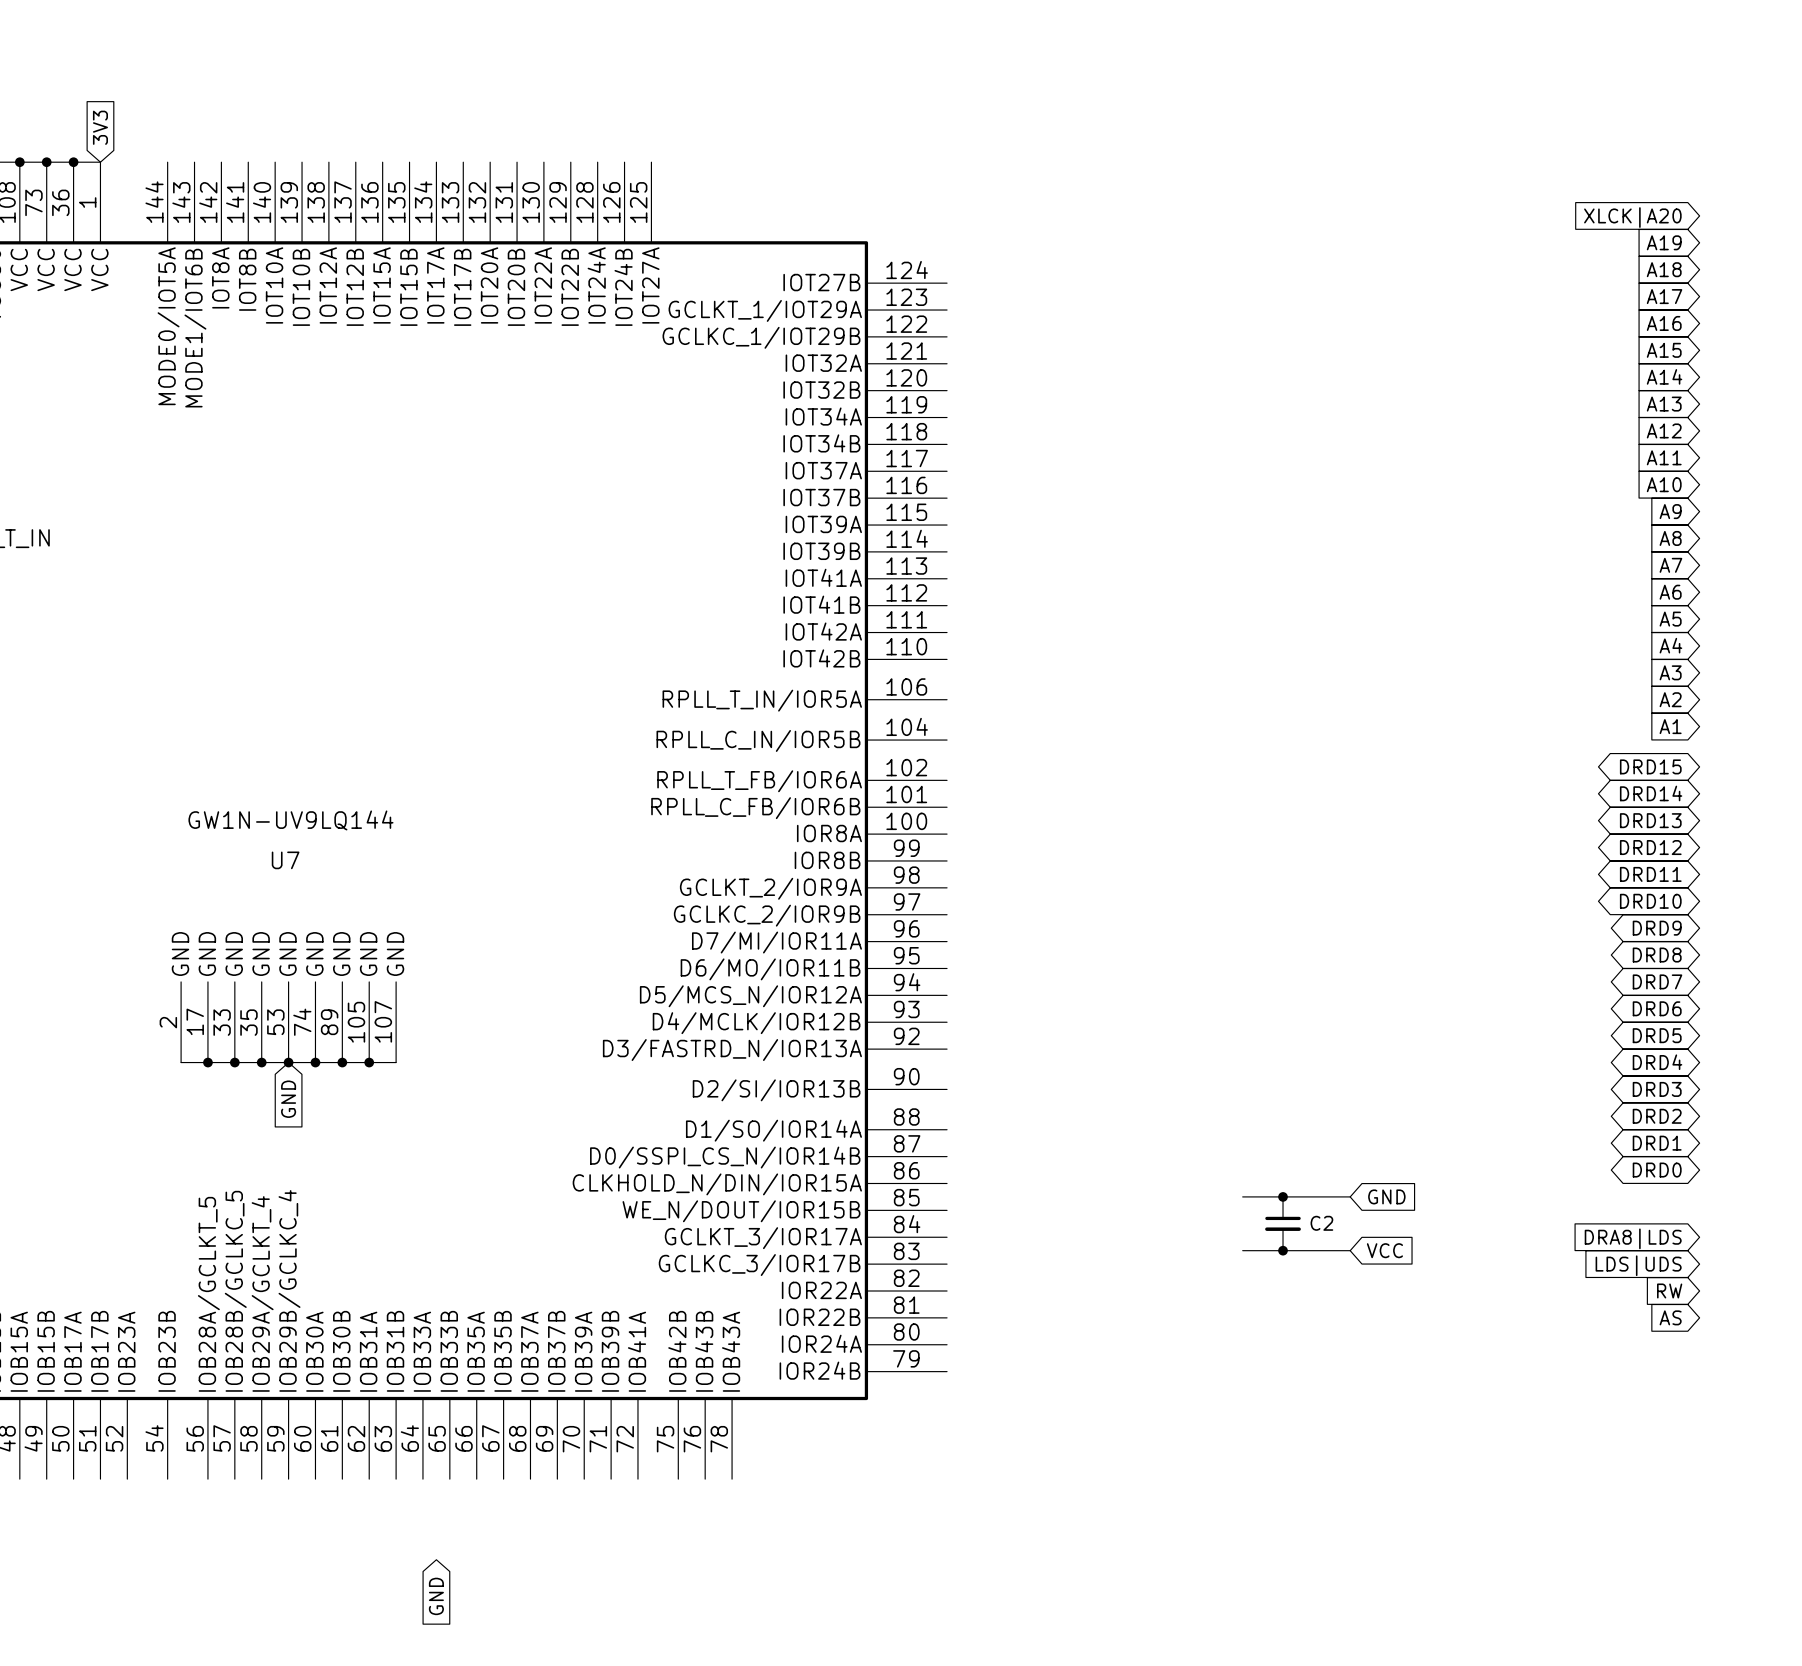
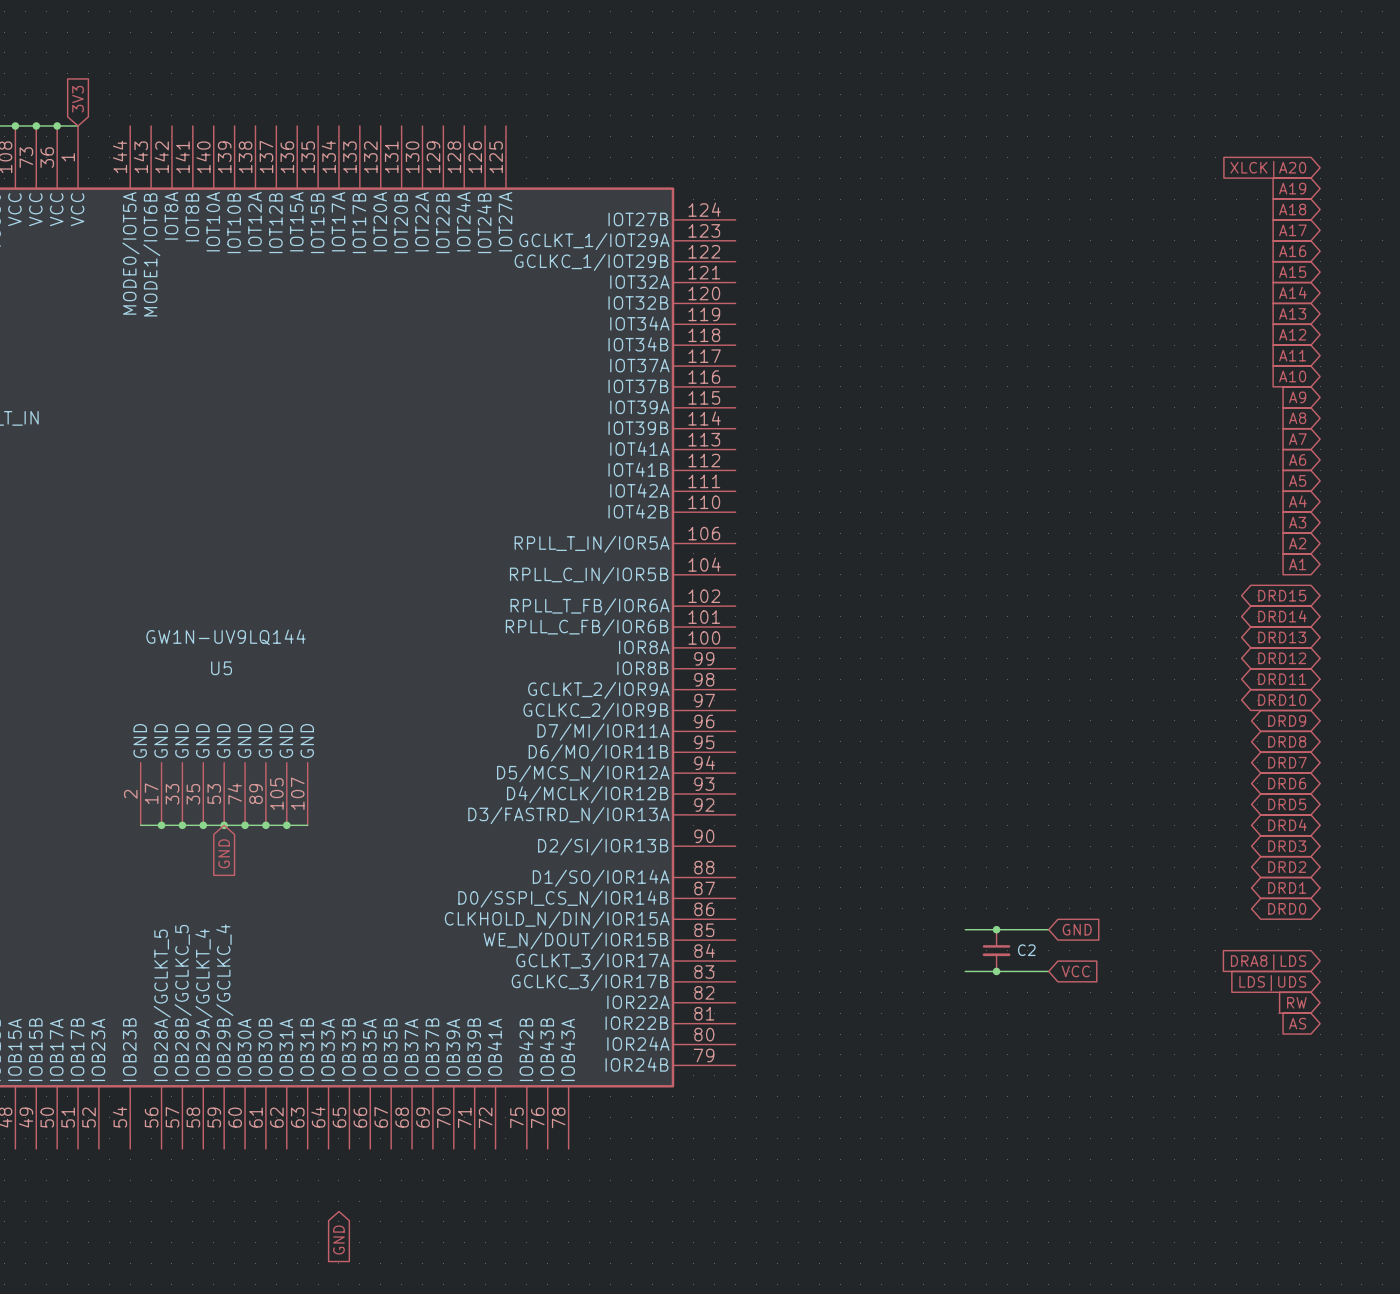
U7 name: U7 (285, 860) -> U5 (221, 668)

